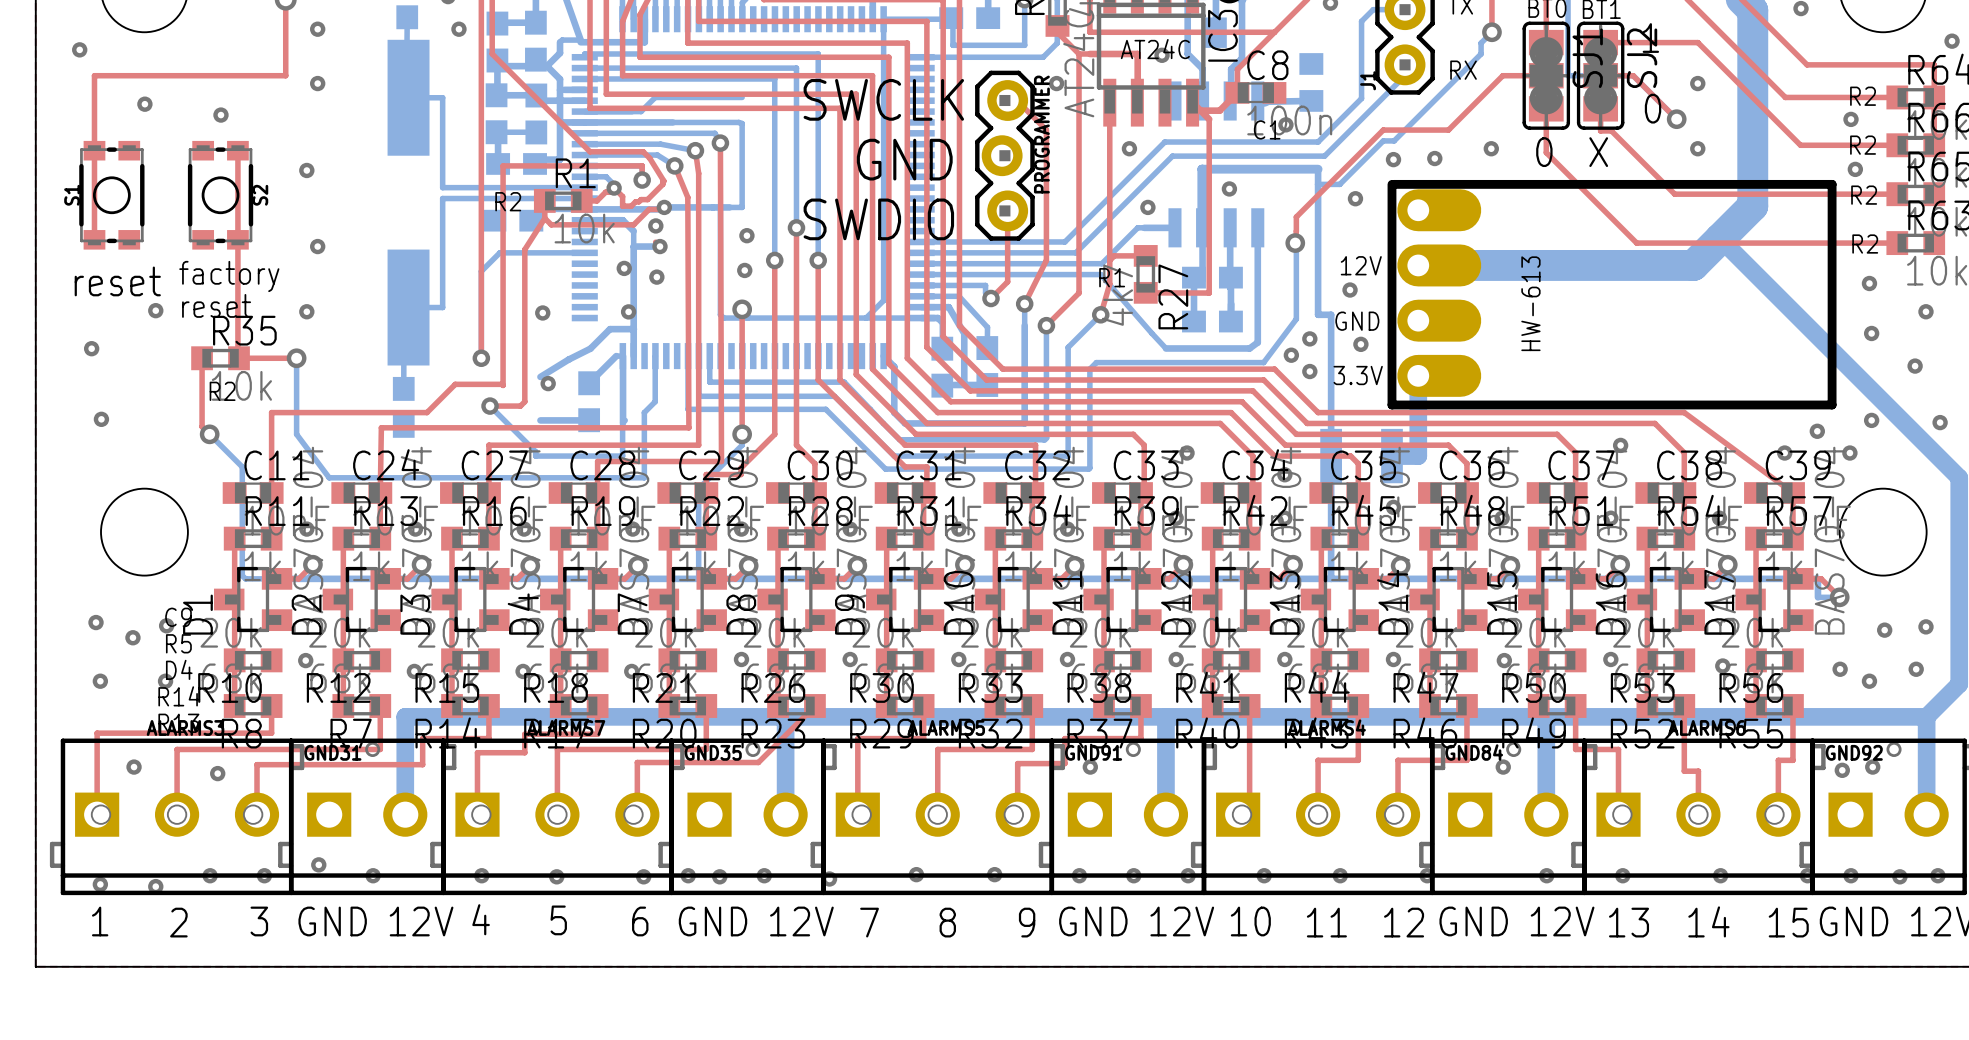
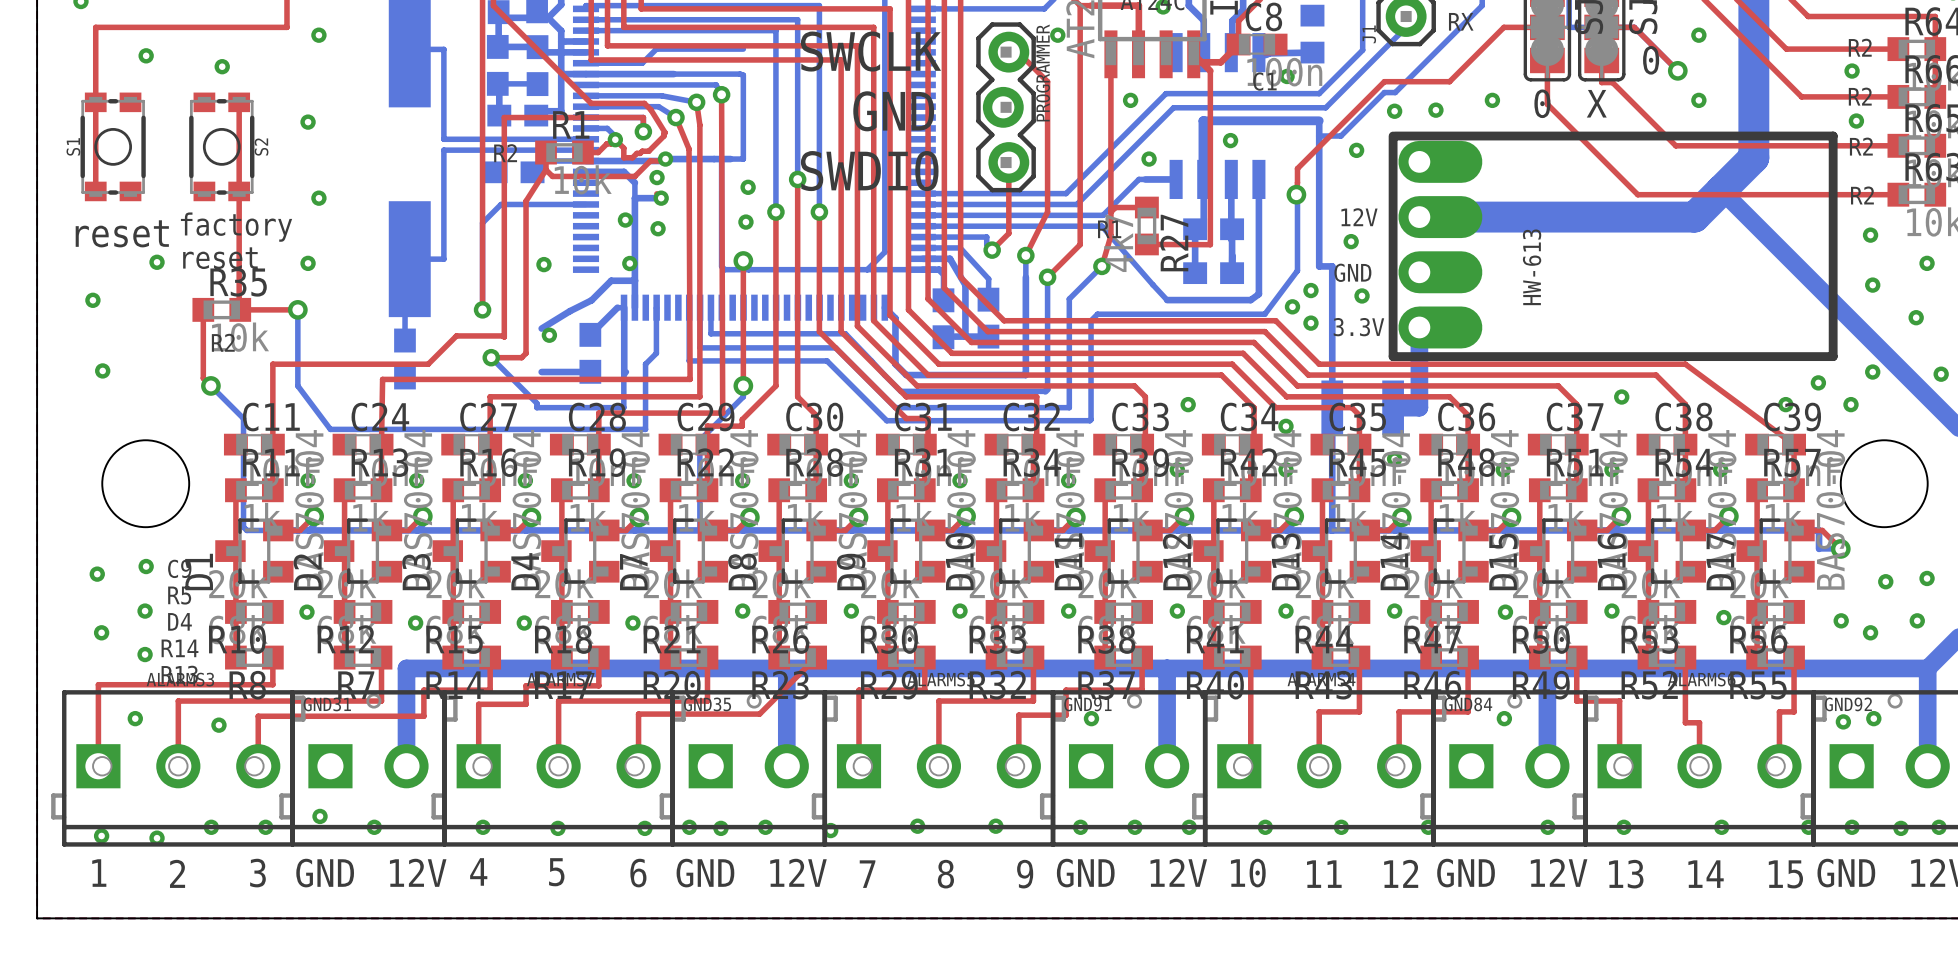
via: none -> (146, 566)
via: (166, 625) -> none
via: (132, 637) -> none
via: none -> (145, 611)
via: (165, 681) -> none
via: none -> (145, 654)

